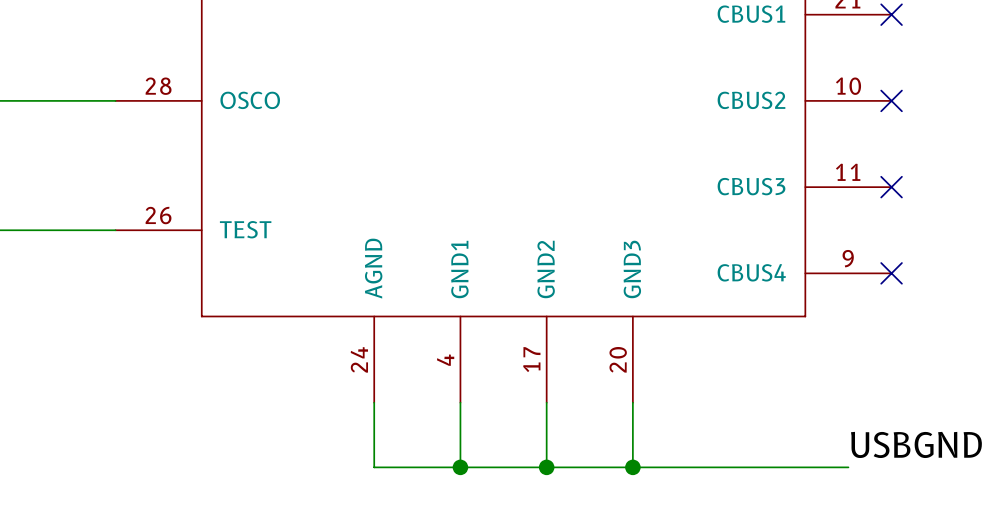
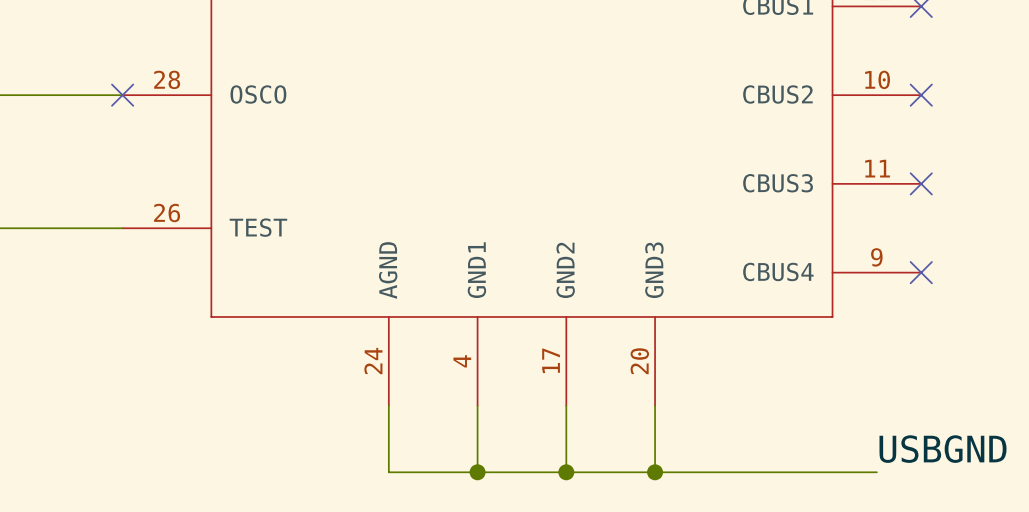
no-connect mark: none -> (122, 95)

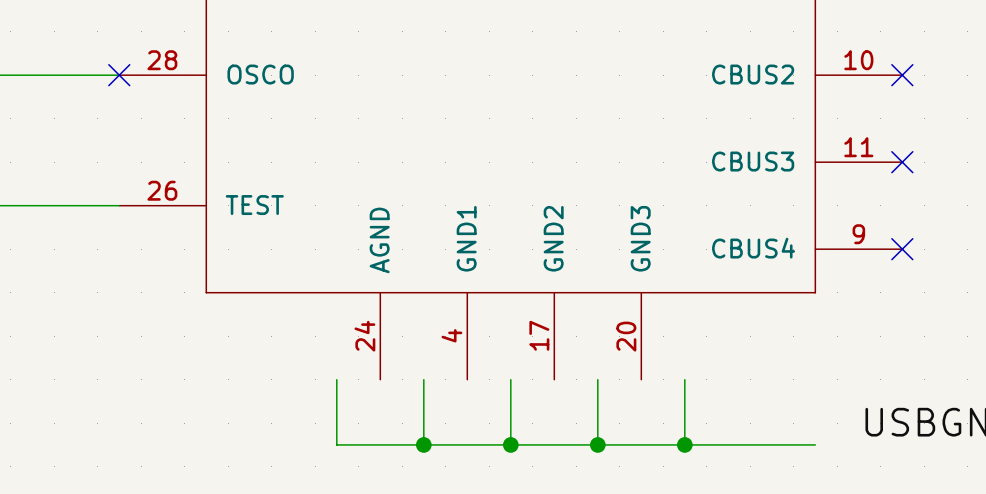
wire: (388, 405) (388, 472) -> (336, 379) (336, 444) (380, 444)
wire: none -> (423, 379) (423, 444)
wire: (477, 405) (477, 472) -> (510, 379) (510, 444)
wire: (566, 405) (566, 472) -> (597, 379) (597, 444)
wire: (655, 405) (655, 472) -> (684, 379) (684, 444)
junction: none -> (423, 444)
junction: (477, 472) -> none
junction: none -> (510, 444)
junction: (566, 472) -> none
junction: none -> (597, 444)
junction: (655, 472) -> none
junction: none -> (684, 444)
wire: (832, 472) (876, 472) -> none

